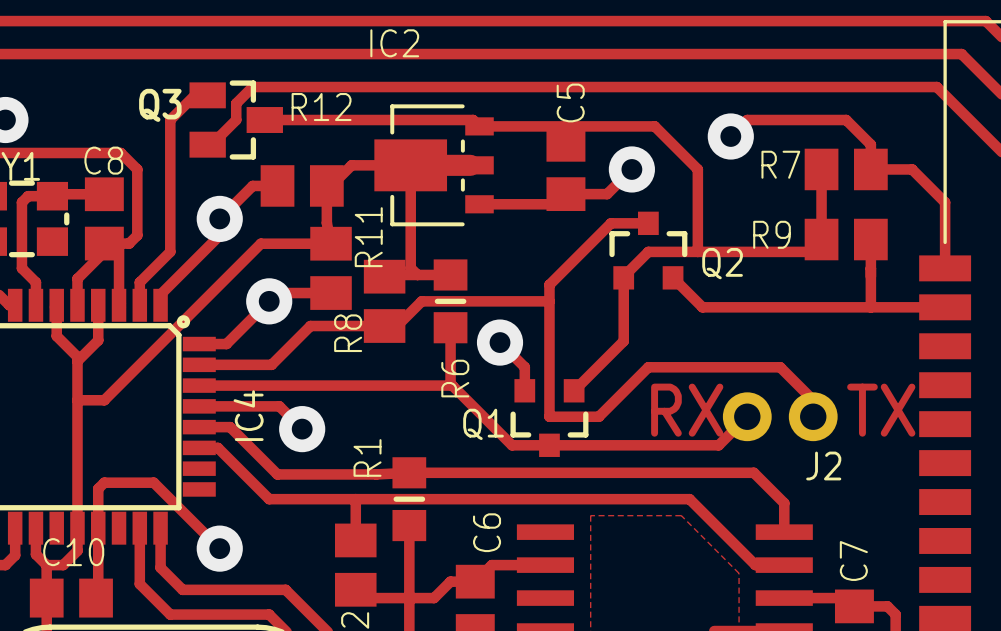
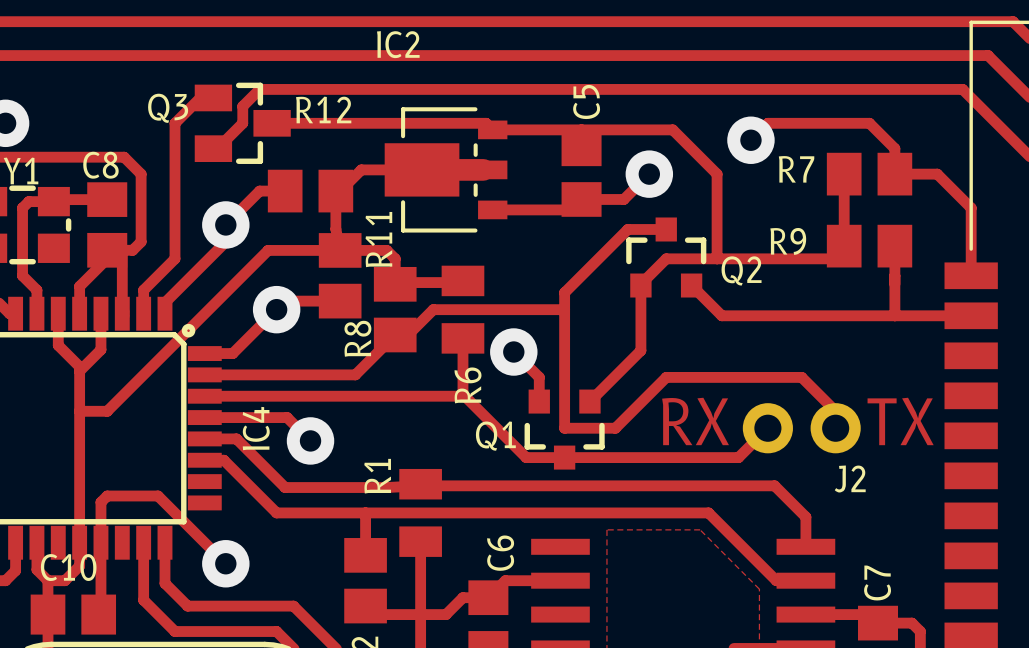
track: (410, 165) (410, 268) (417, 274) -> none
track: none -> (340, 250) (386, 250) (395, 258) (395, 284)
R6 footprint: [433, 259, 468, 344] -> [441, 265, 485, 354]
track: (384, 326) (310, 326) (271, 364) -> (395, 335) (355, 374) (279, 374)
R1 footprint: [392, 457, 427, 542] -> [399, 468, 442, 557]

